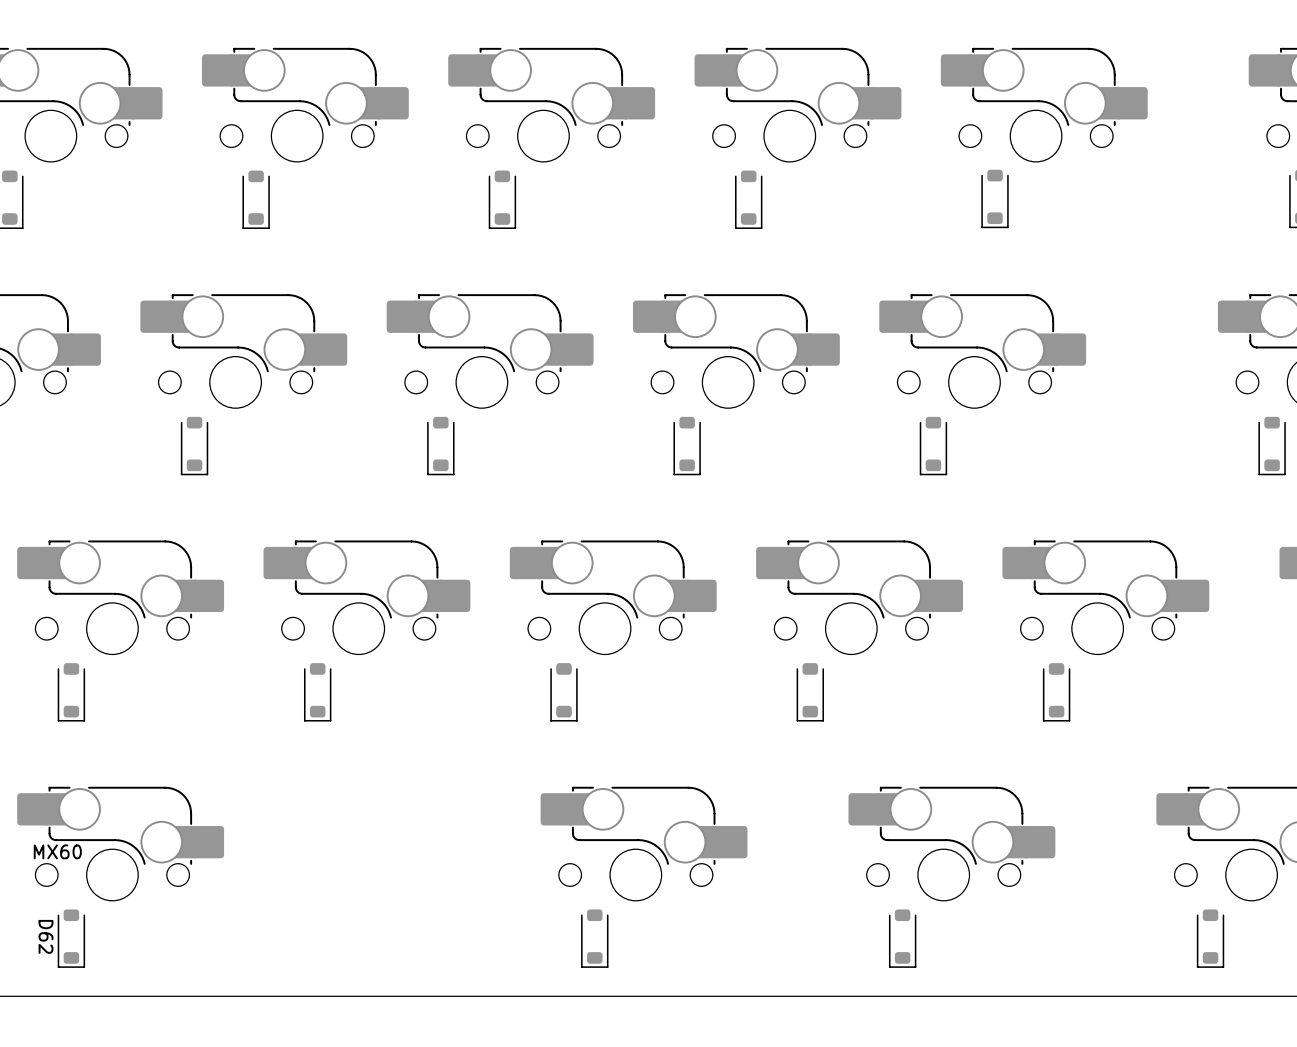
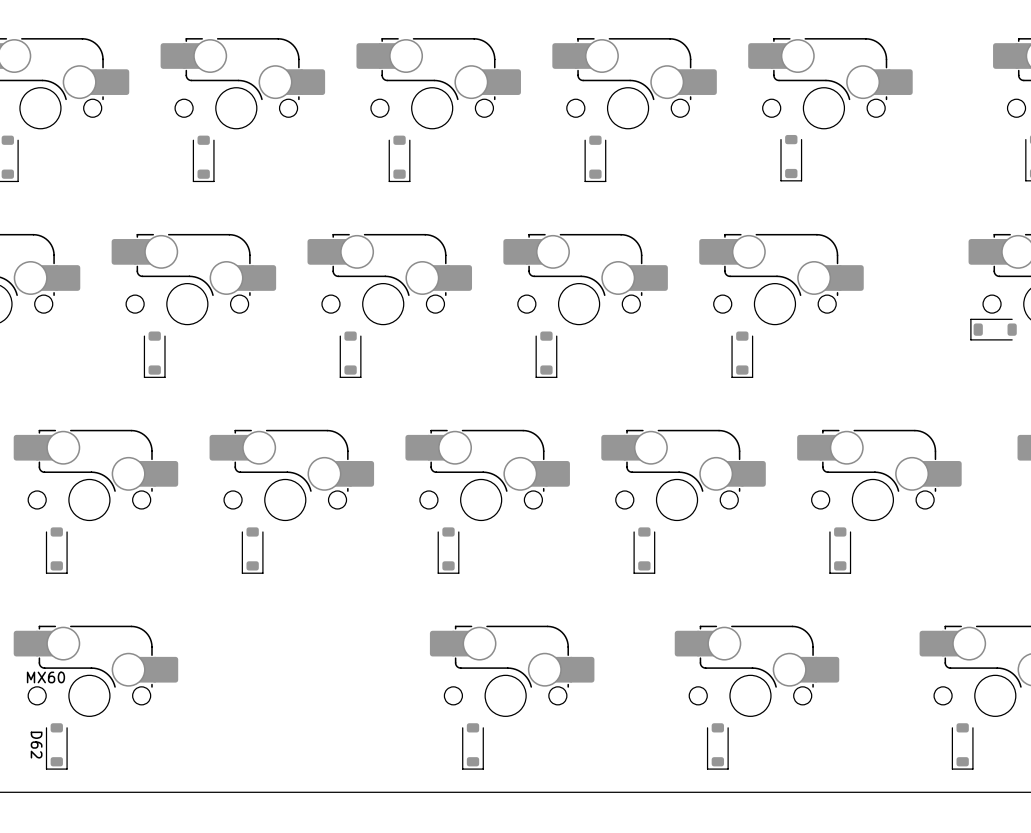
part rotation: 0° (1272, 446) -> 90° clockwise (993, 329)
part position: (1272, 446) -> (993, 329)

